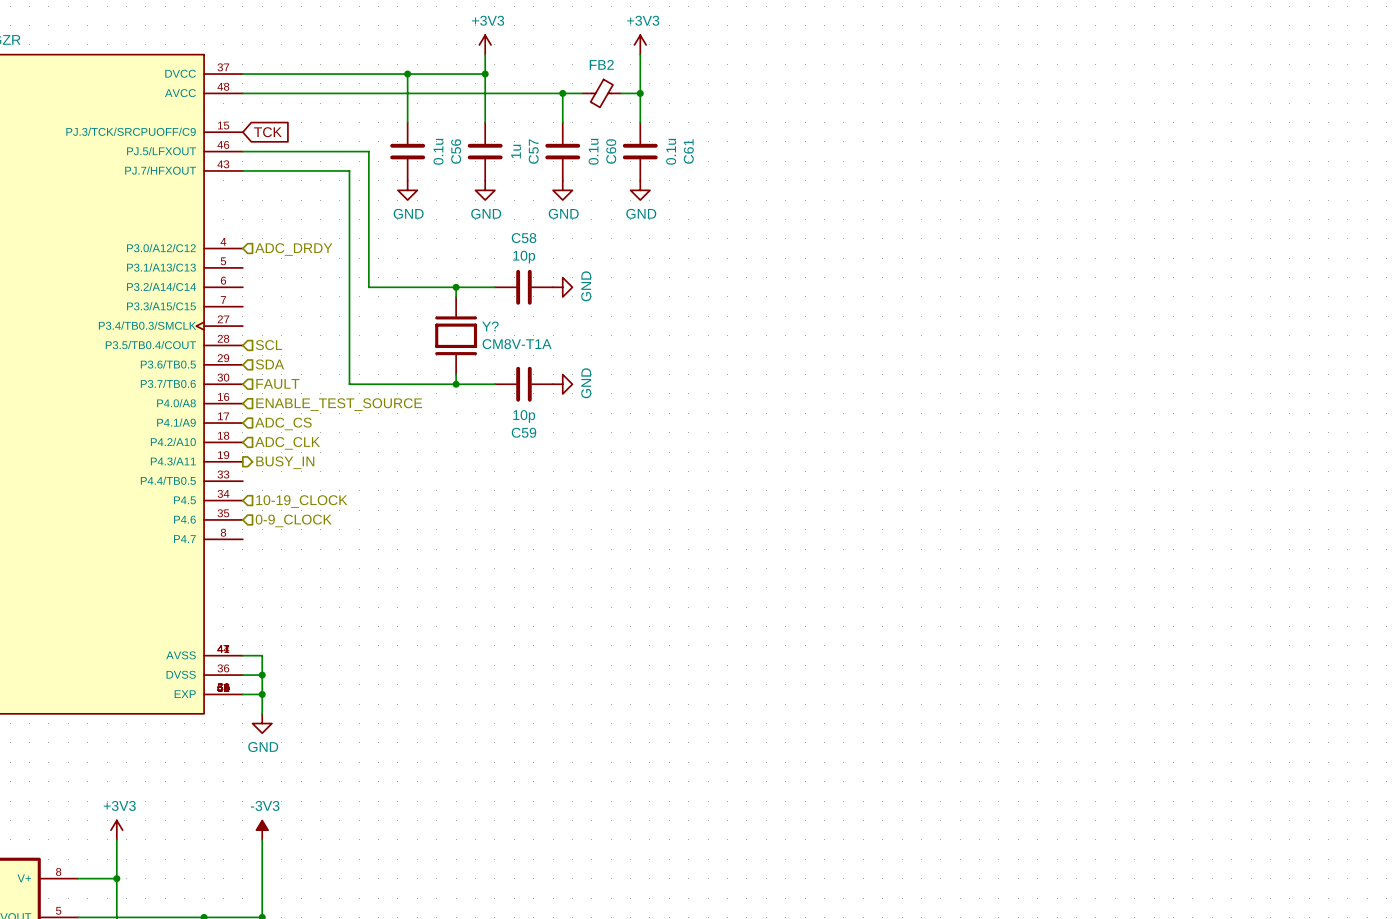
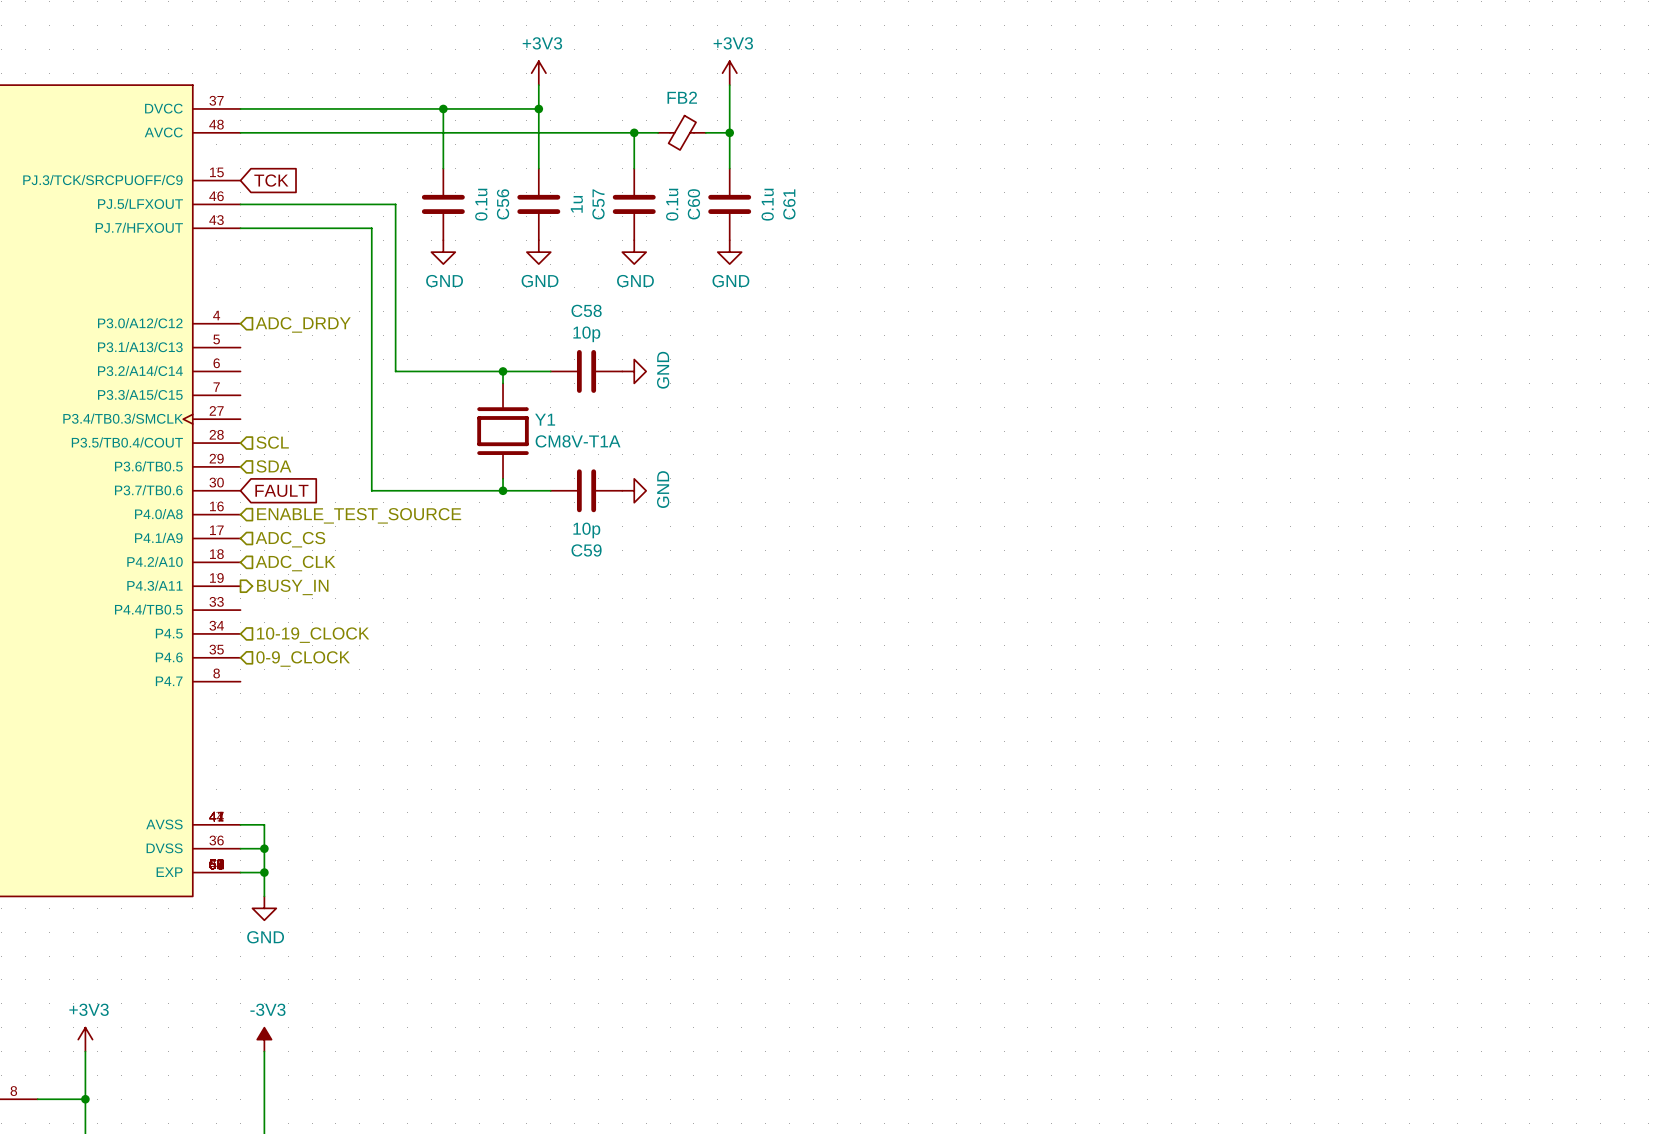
Y? name: Y? (490, 326) -> Y1 (545, 419)
hierarchical label: FAULT (277, 383) -> none
global label: none -> FAULT (281, 490)

